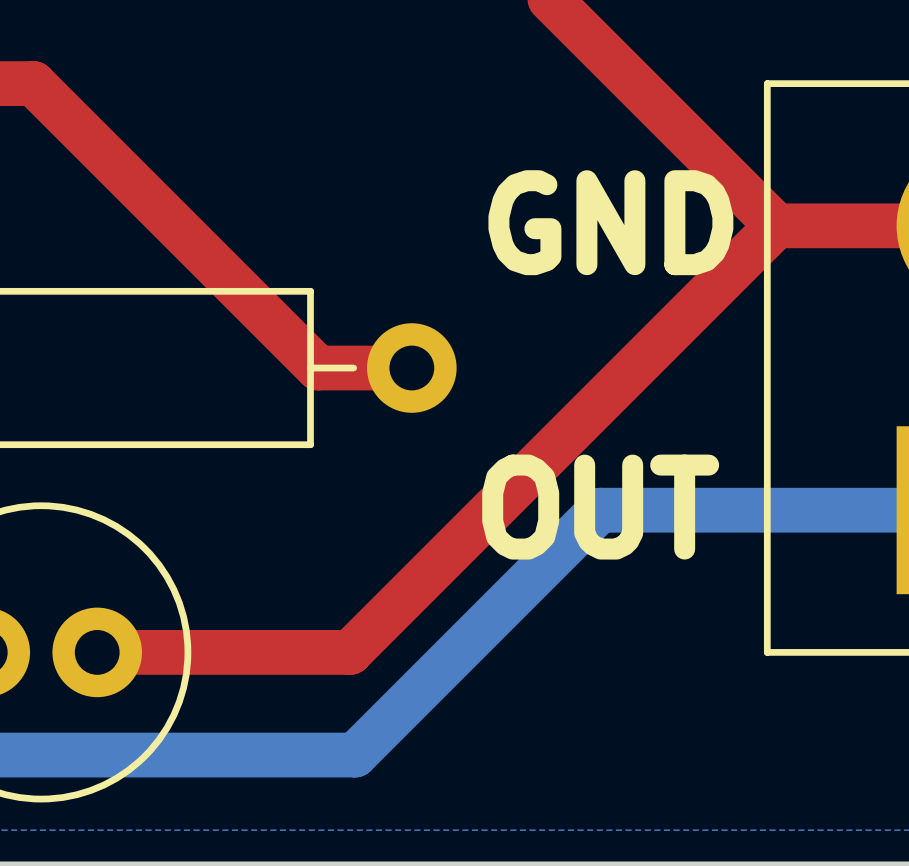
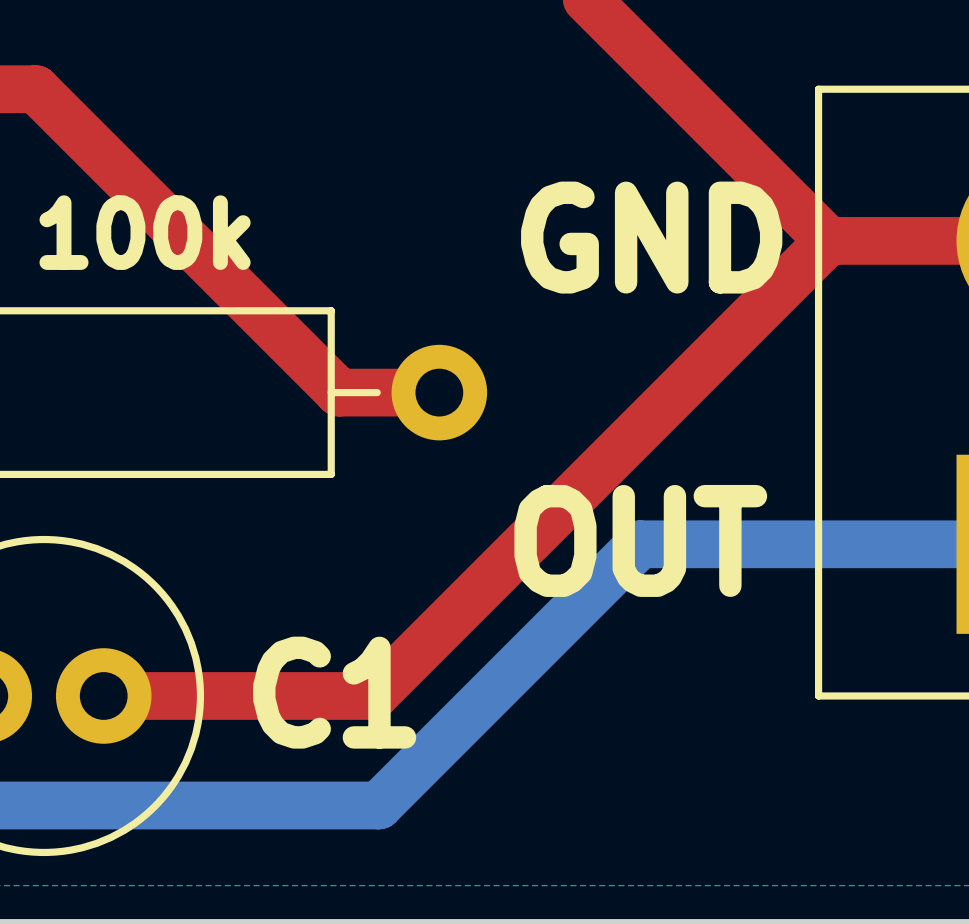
text: none -> 100k (145, 232)
text: none -> C1 (334, 692)

